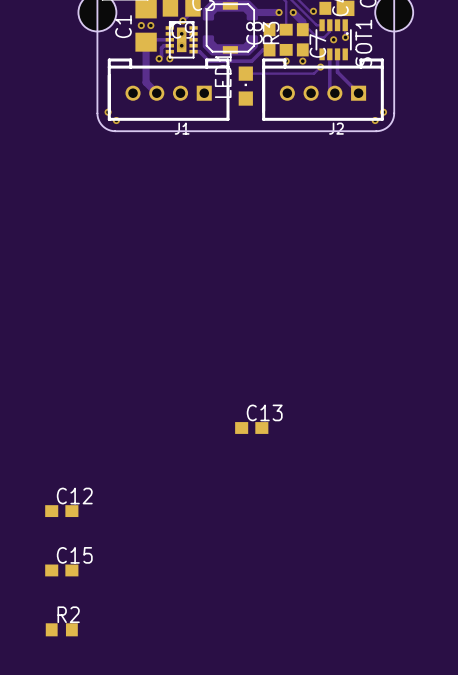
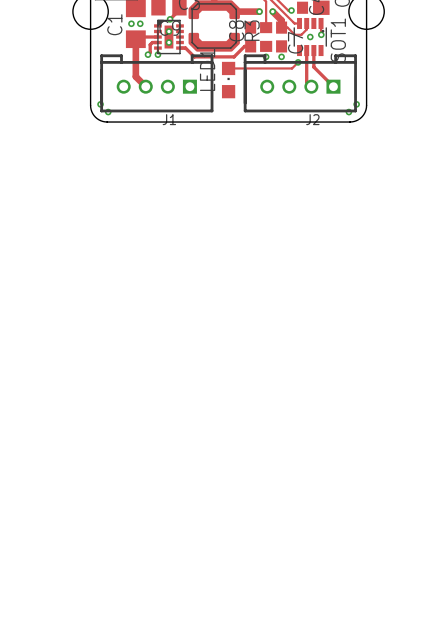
C13: (251, 427) -> none
C12: (61, 511) -> none
C15: (61, 570) -> none
R2: (61, 629) -> none

